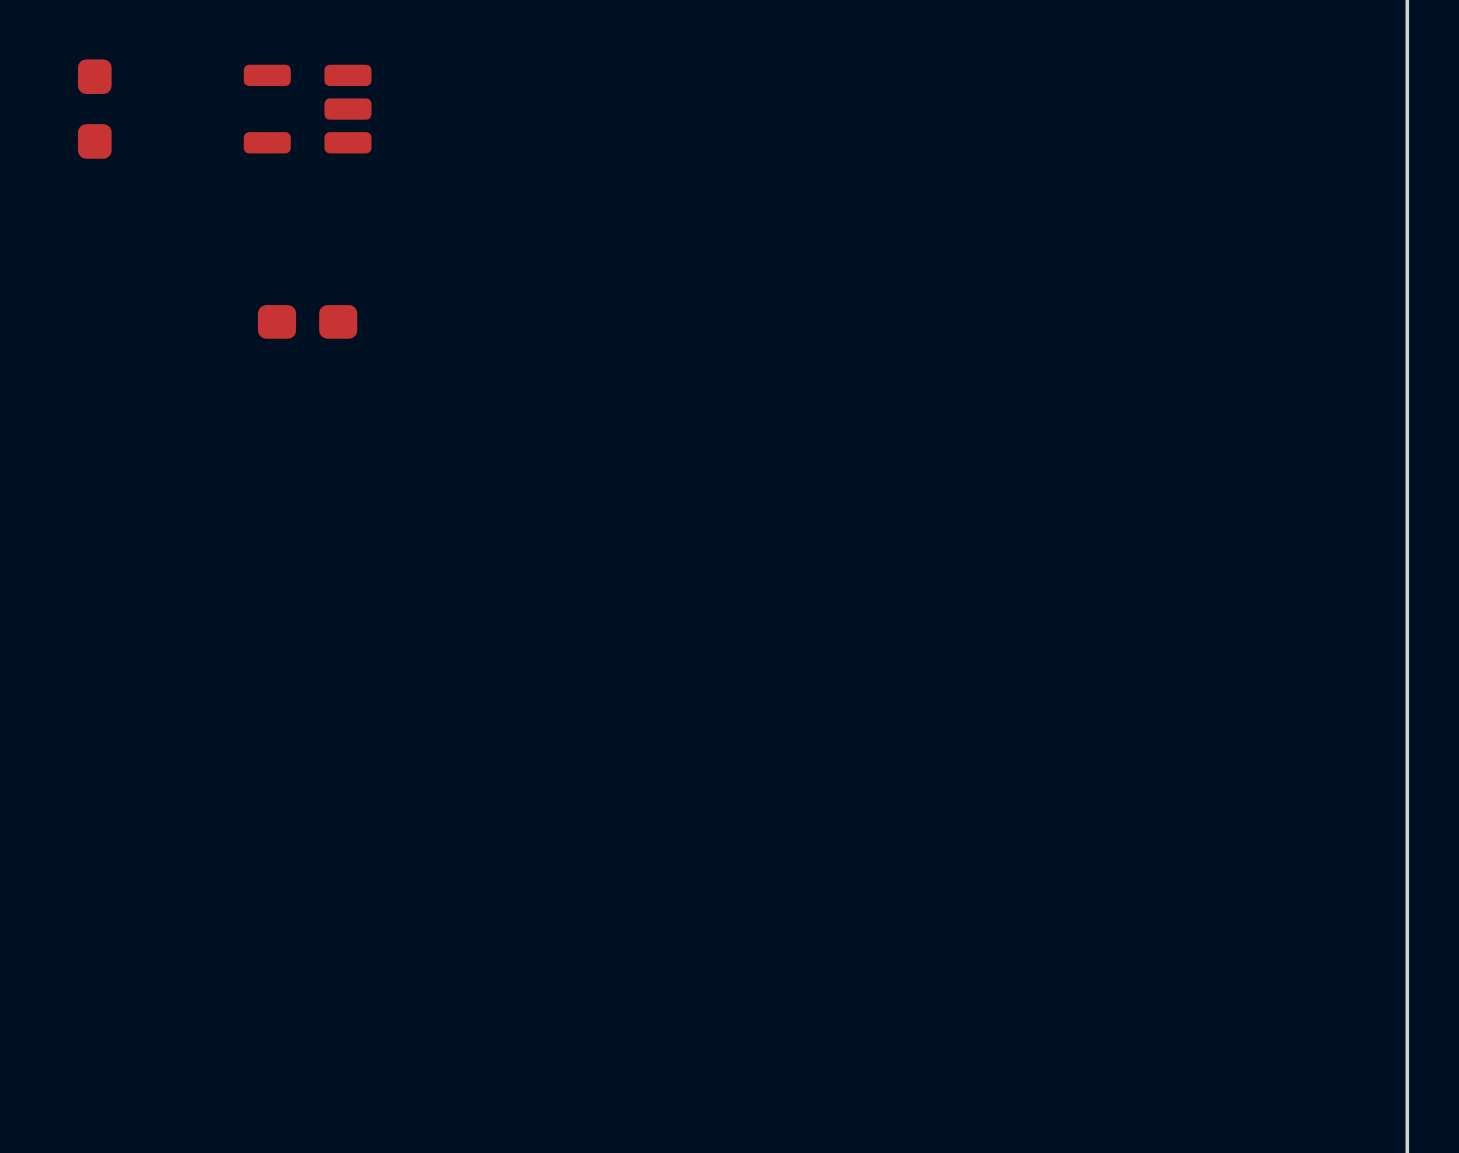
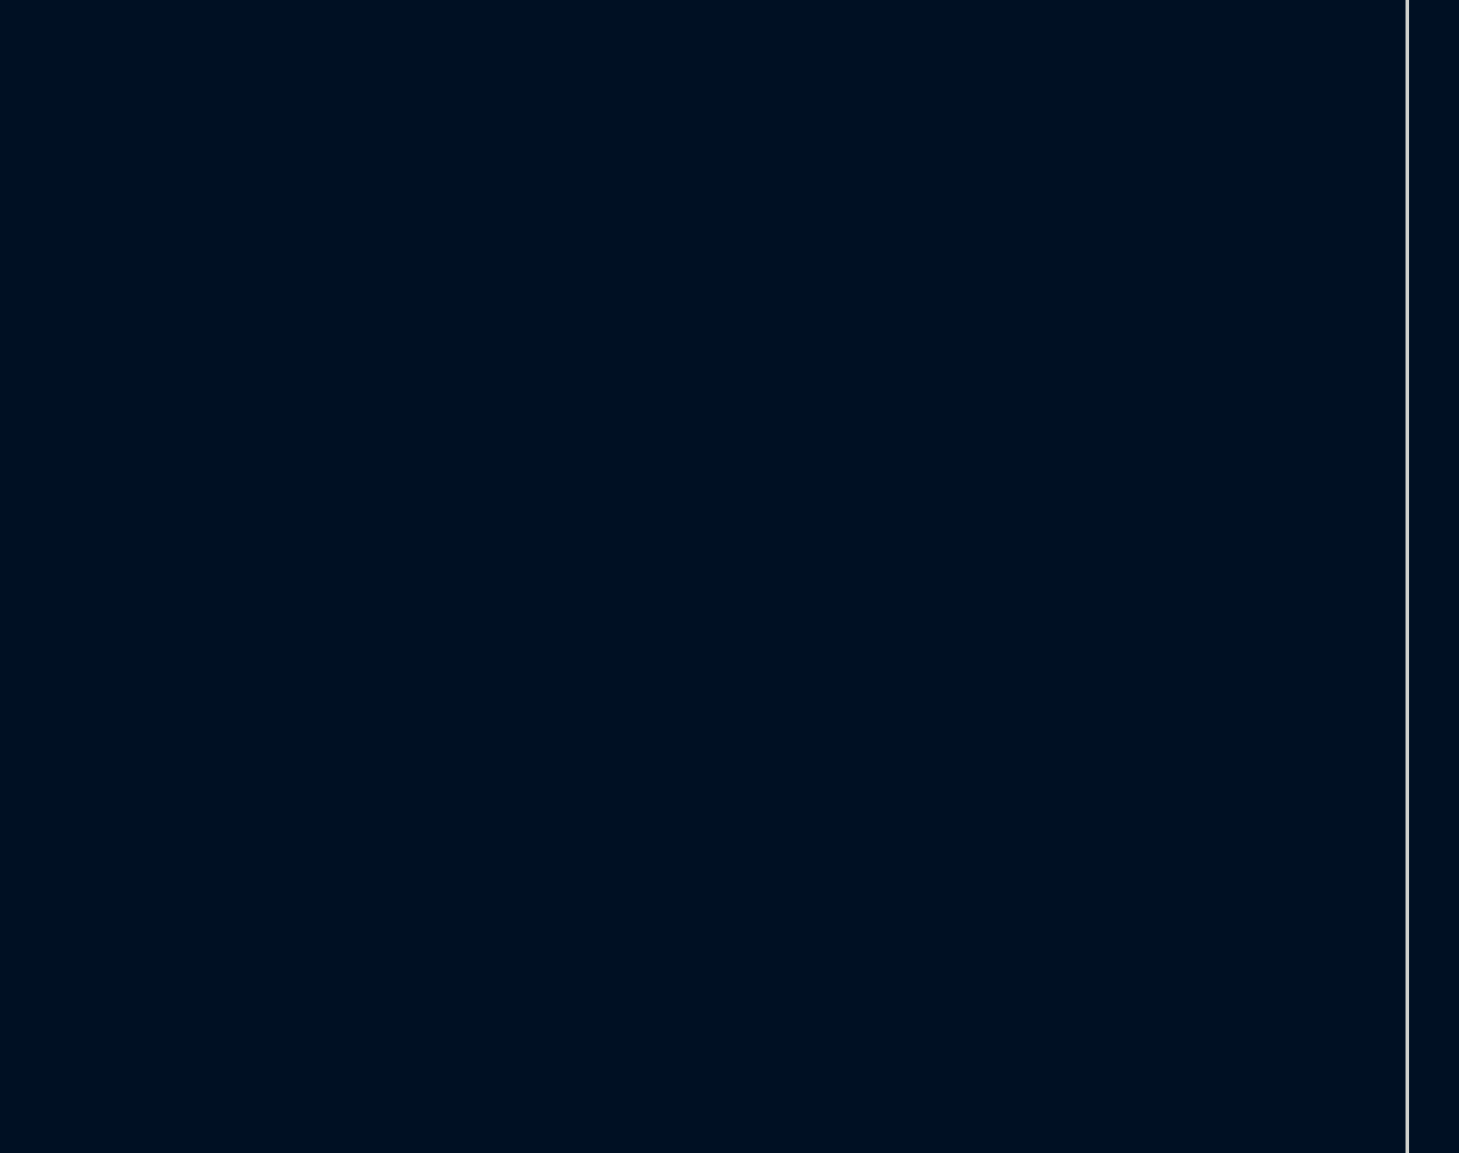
part: (94, 109) -> none
part: (307, 109) -> none
part: (307, 321) -> none

